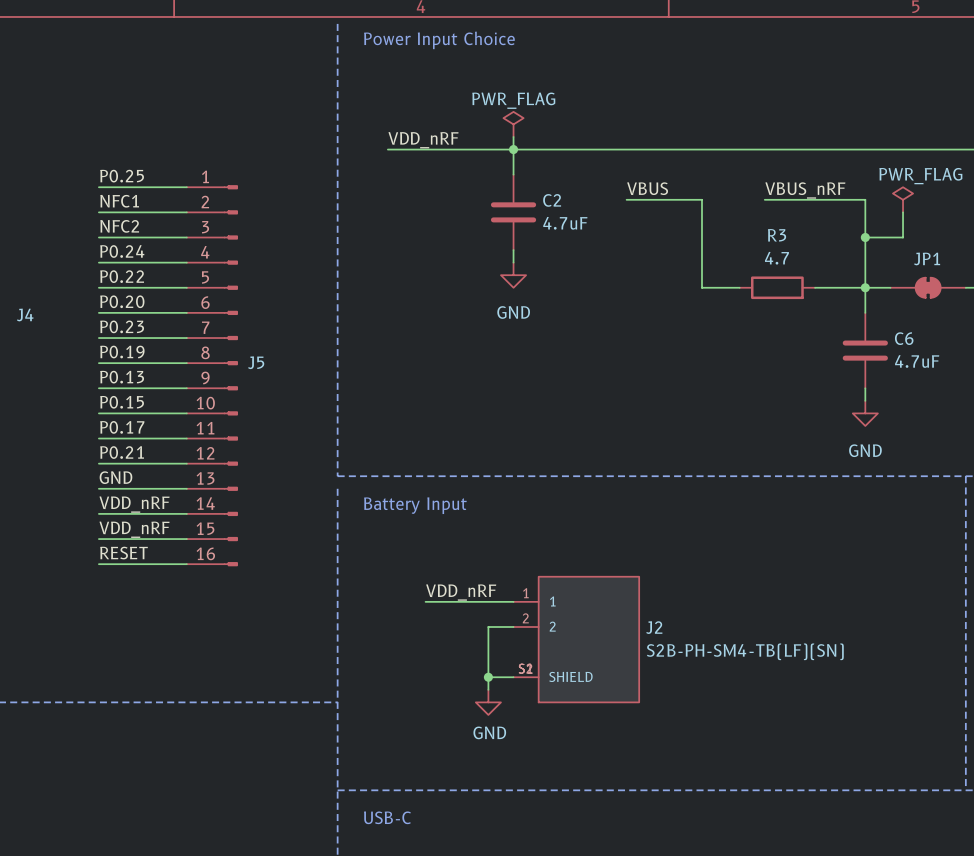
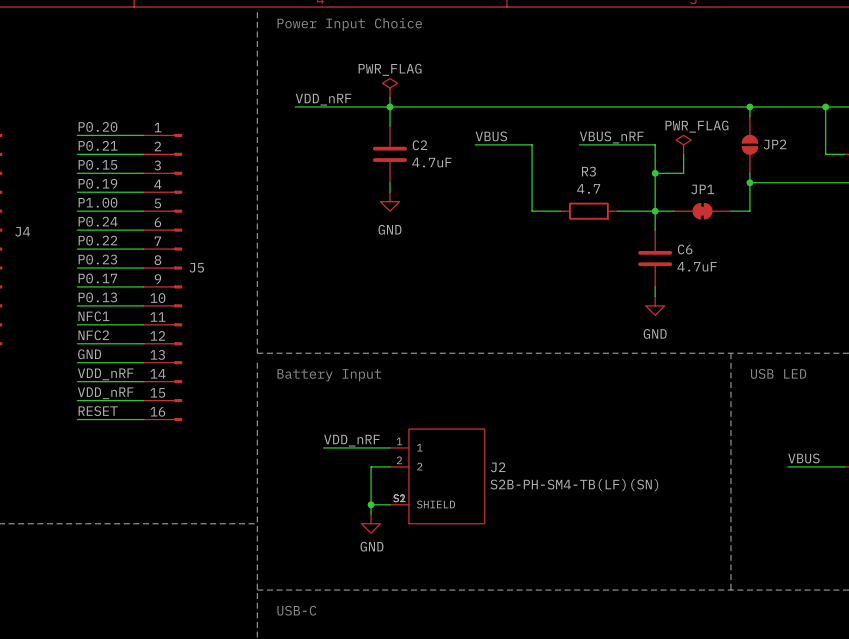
label: P0.25 (122, 176) -> P0.20 (97, 126)
label: NFC1 (119, 201) -> P0.21 (98, 145)
label: NFC2 (119, 226) -> P0.15 (97, 164)
label: P0.24 (122, 251) -> P0.19 (97, 183)
label: P0.22 (122, 276) -> P1.00 (97, 202)
label: P0.20 (122, 301) -> P0.24 (98, 221)
label: P0.23 (122, 326) -> P0.22 (97, 240)
label: P0.19 (122, 352) -> P0.23 (97, 259)
label: P0.13 (122, 377) -> P0.17 (97, 278)
label: P0.15 (122, 402) -> P0.13 (97, 297)
label: P0.17 (122, 427) -> NFC1 (93, 316)
label: P0.21 (122, 452) -> NFC2 (93, 335)

